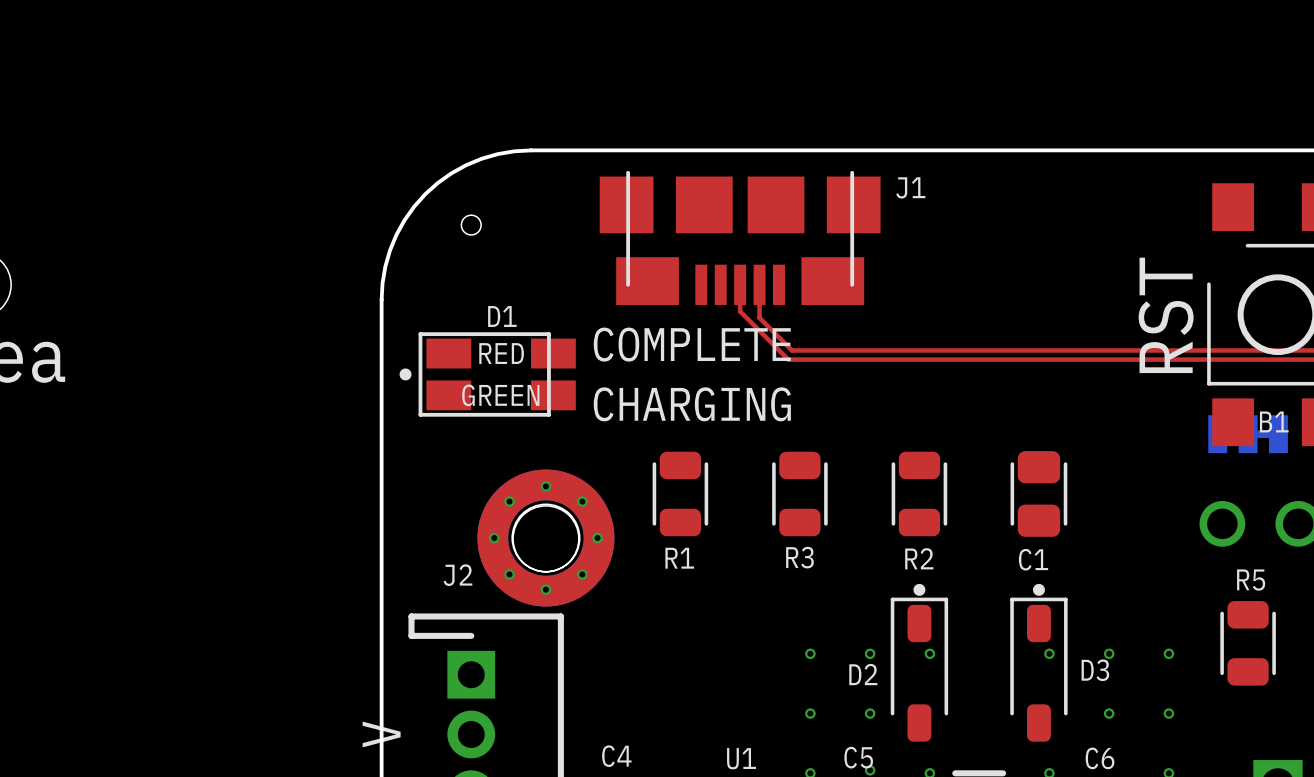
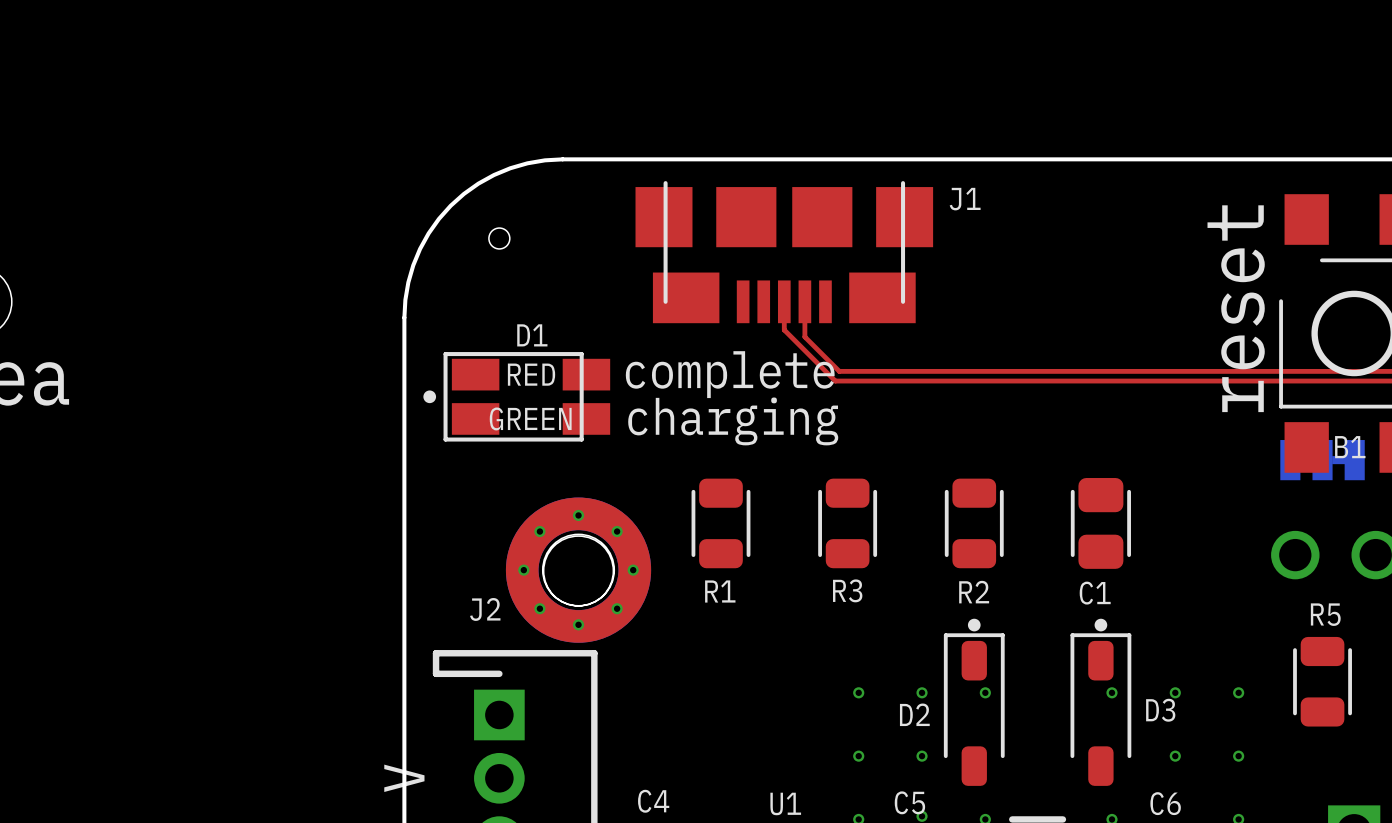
text: RST (1166, 315) -> reset (1236, 308)
text: COMPLETE (692, 344) -> complete (730, 374)
text: CHARGING (692, 404) -> charging (733, 421)

